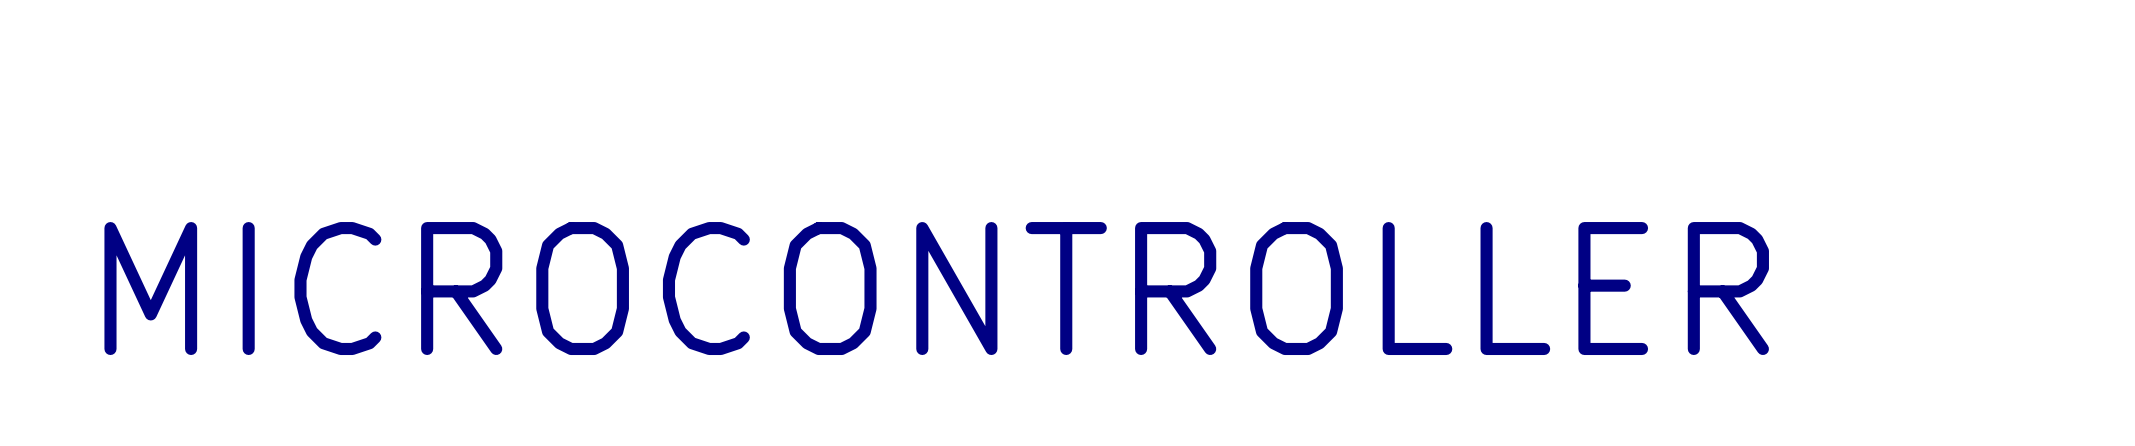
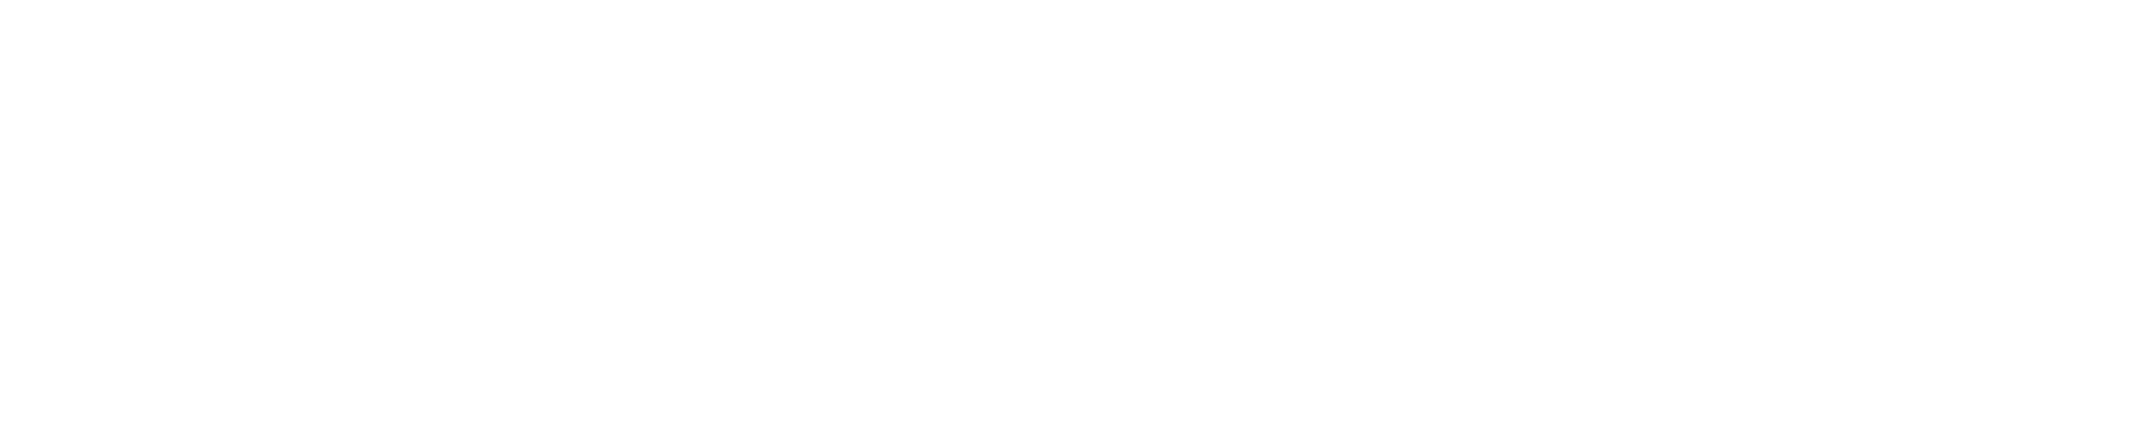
text: MICROCONTROLLER (936, 288) -> none

